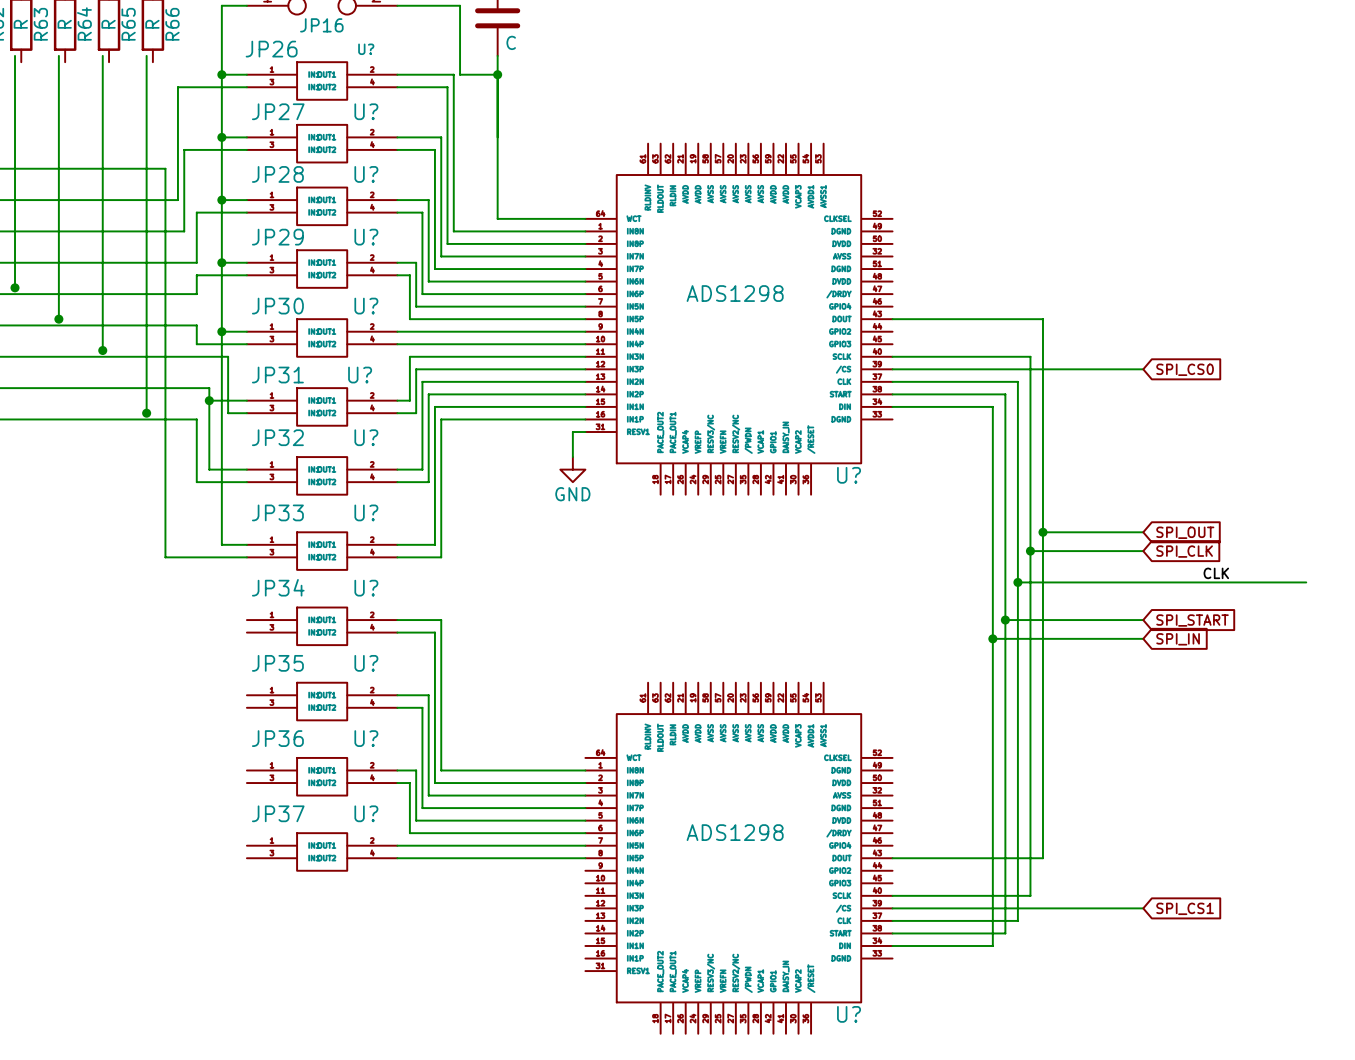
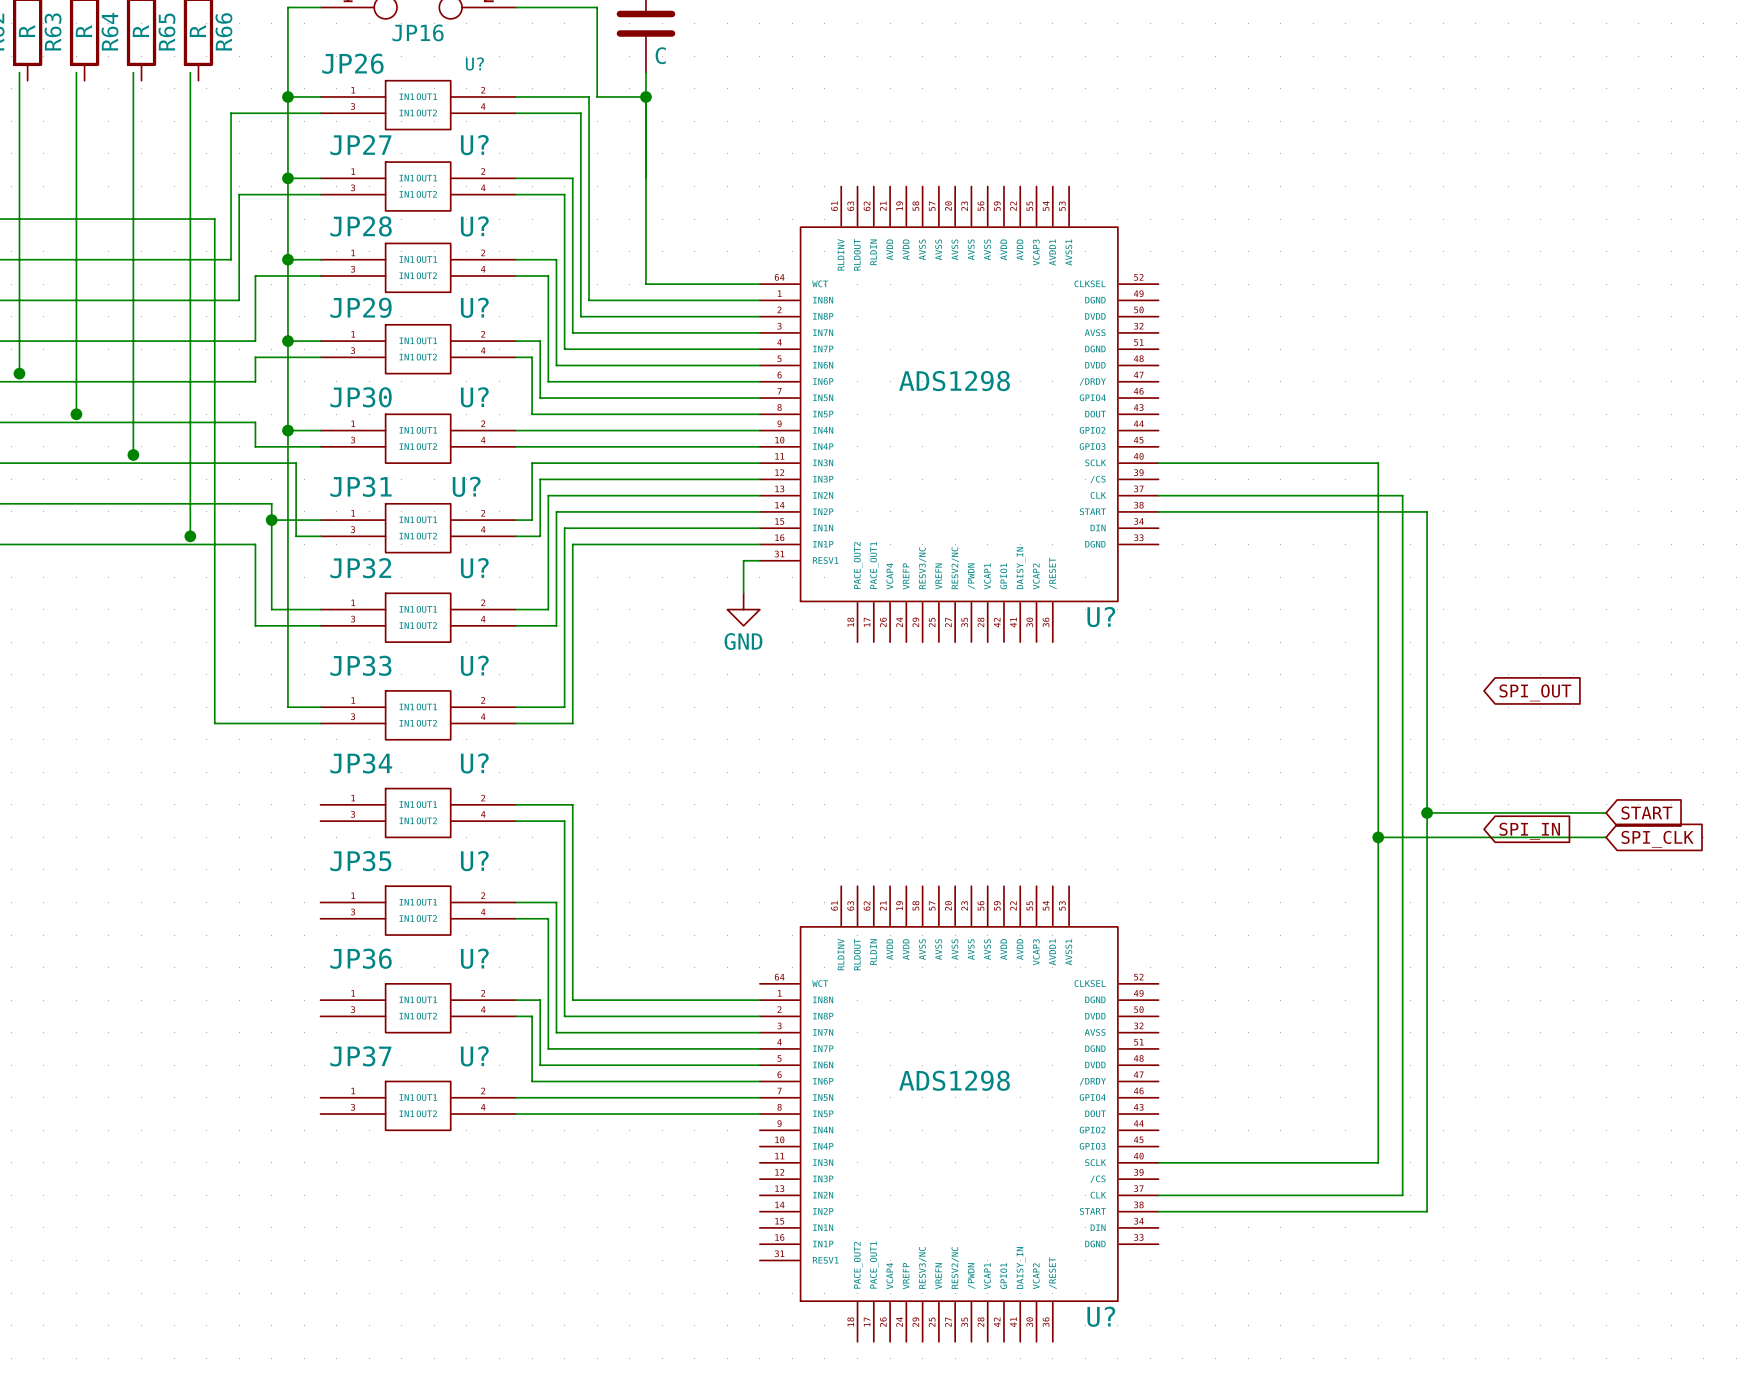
wire: (892, 319) (1042, 319) (1042, 858) (892, 858) -> none
wire: (1030, 356) (1030, 895) -> (1337, 463) (1378, 463) (1378, 1162) (1337, 1162)
wire: (892, 369) (1143, 369) -> none
global label: SPI_CS0 (1185, 369) -> none
wire: (1017, 381) (1017, 920) -> (1321, 495) (1402, 495) (1402, 1195) (1321, 1195)
wire: (1005, 394) (1005, 933) -> (1305, 511) (1427, 511) (1427, 1211) (1305, 1211)
wire: (892, 406) (992, 406) (992, 945) (892, 945) -> none
wire: (1042, 532) (1143, 532) -> none
junction: (1042, 532) -> none
wire: (1030, 551) (1143, 551) -> none
junction: (1030, 551) -> none
global label position: SPI_CLK (1184, 551) -> SPI_CLK (1657, 839)
label: CLK (1216, 573) -> none
wire: (1017, 582) (1306, 582) -> none
junction: (1017, 582) -> none
wire: (1005, 620) (1143, 620) -> (1427, 812) (1606, 812)
junction: (1005, 620) -> none
global label: SPI_START (1192, 620) -> START (1646, 812)
junction: none -> (1427, 812)
wire: (992, 638) (1143, 638) -> none
junction: (992, 638) -> none
wire: none -> (1378, 837) (1606, 837)
junction: none -> (1378, 837)
wire: (892, 908) (1143, 908) -> none
global label: SPI_CS1 (1185, 908) -> none

